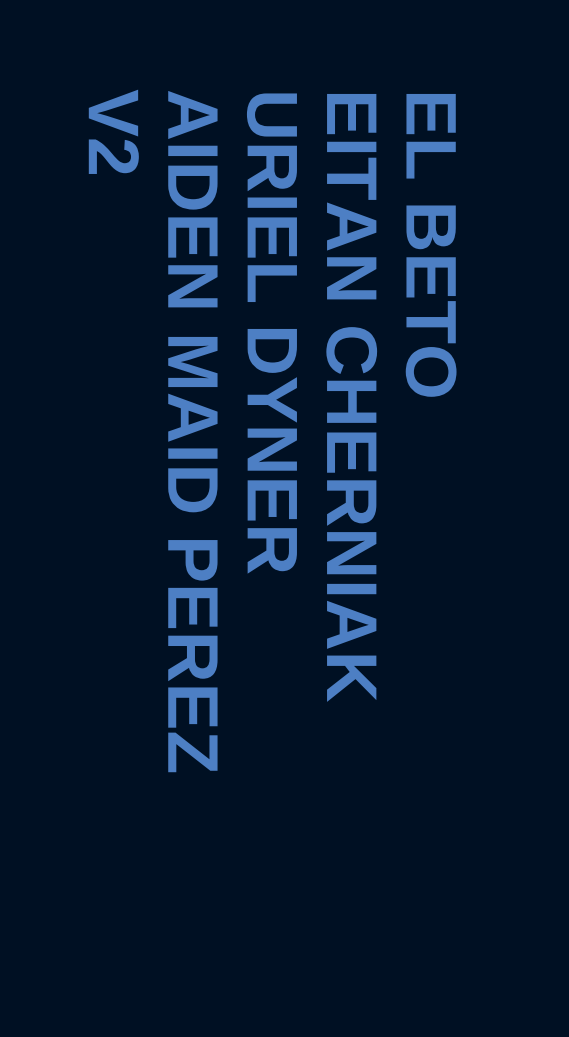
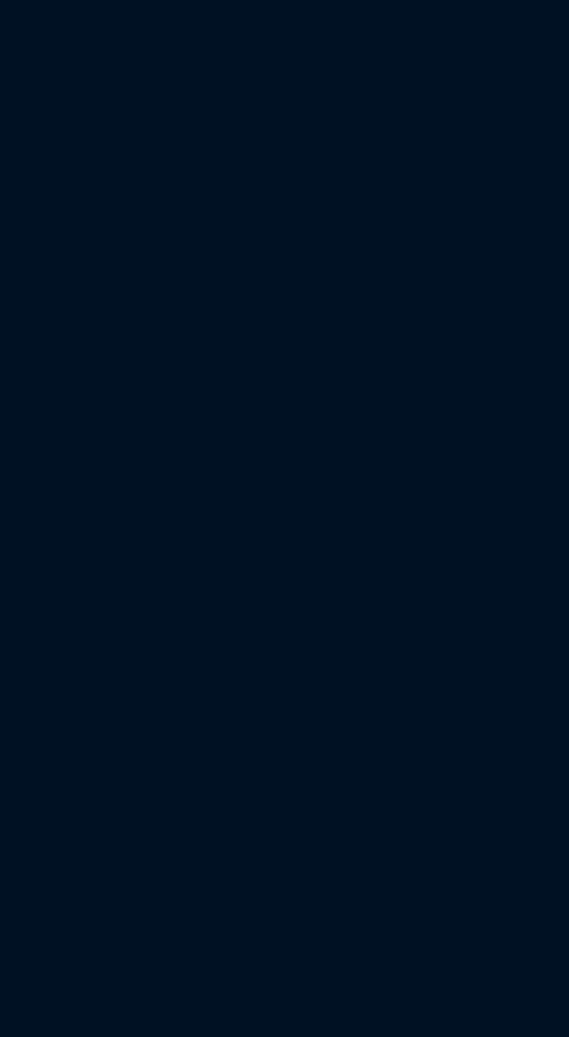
text: V2 (113, 131) -> none
text: EL BETO (431, 245) -> none
text: URIEL DYNER (271, 333) -> none
text: EITAN CHERNIAK (351, 397) -> none
text: AIDEN MAID PEREZ (192, 431) -> none

